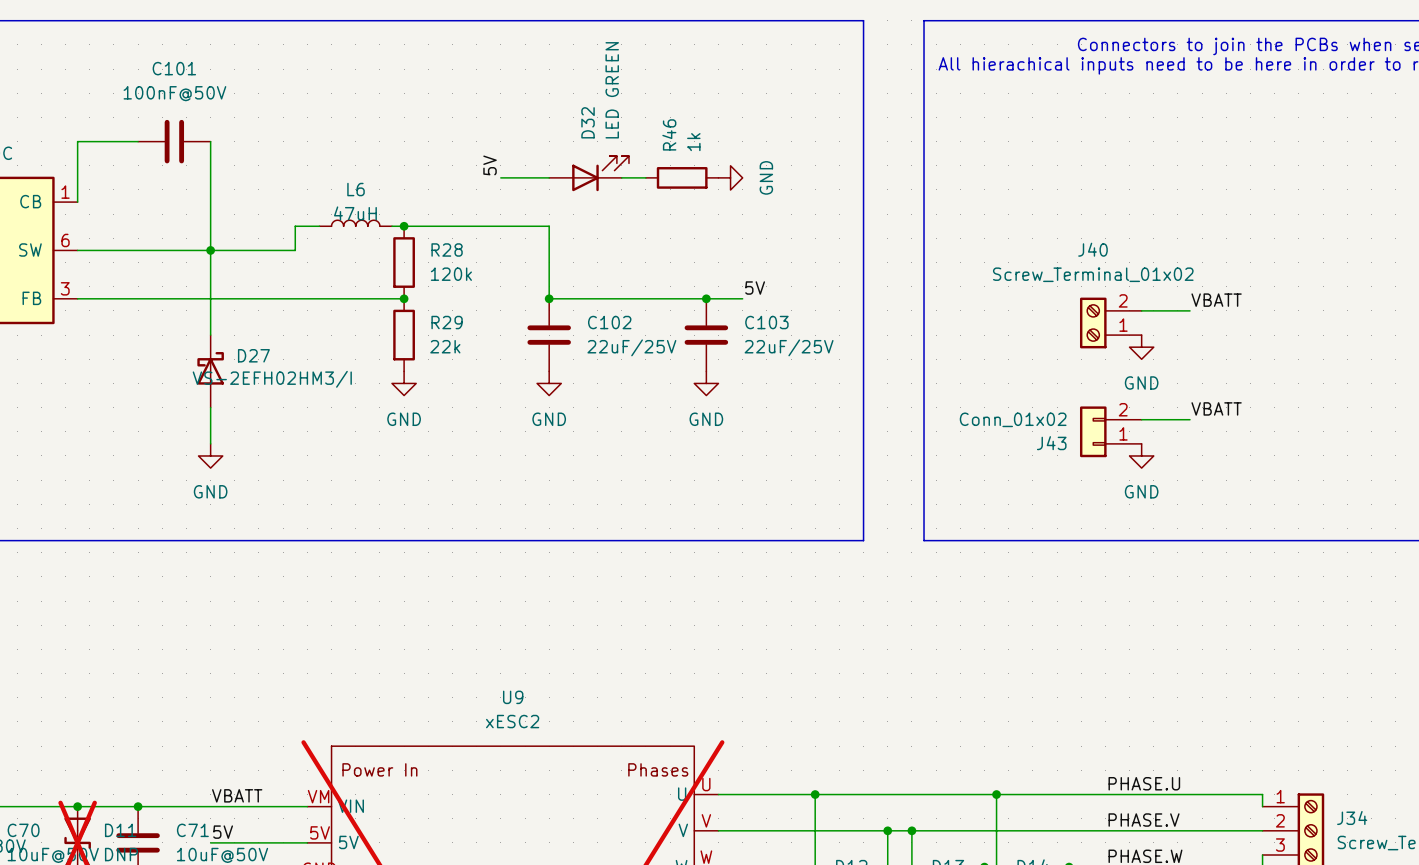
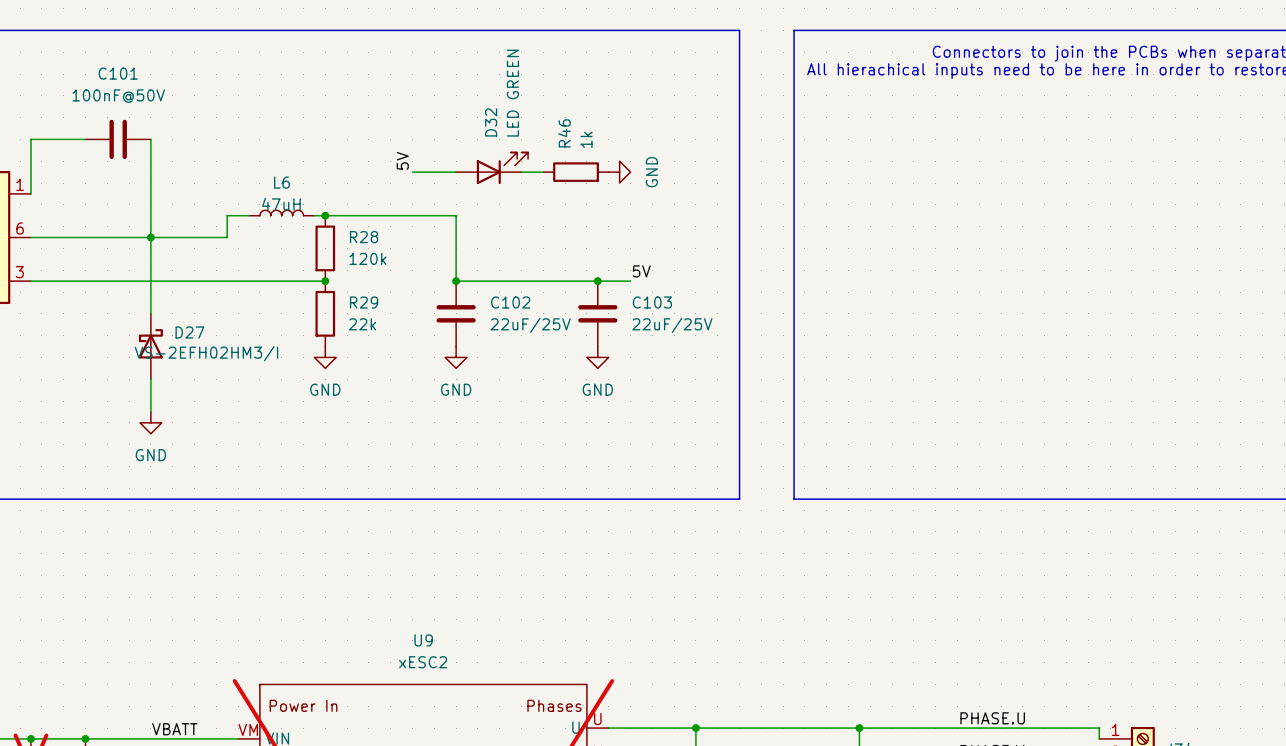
label: VBATT (1216, 300) -> none
wire: (1141, 310) (1190, 310) -> none
J40: Screw_Terminal_01x02 (1110, 322) -> none
power symbol: GND (1141, 347) -> none
label: VBATT (1216, 408) -> none
wire: (1141, 419) (1190, 419) -> none
J43: Conn_01x02 (1110, 431) -> none
power symbol: GND (1141, 455) -> none

